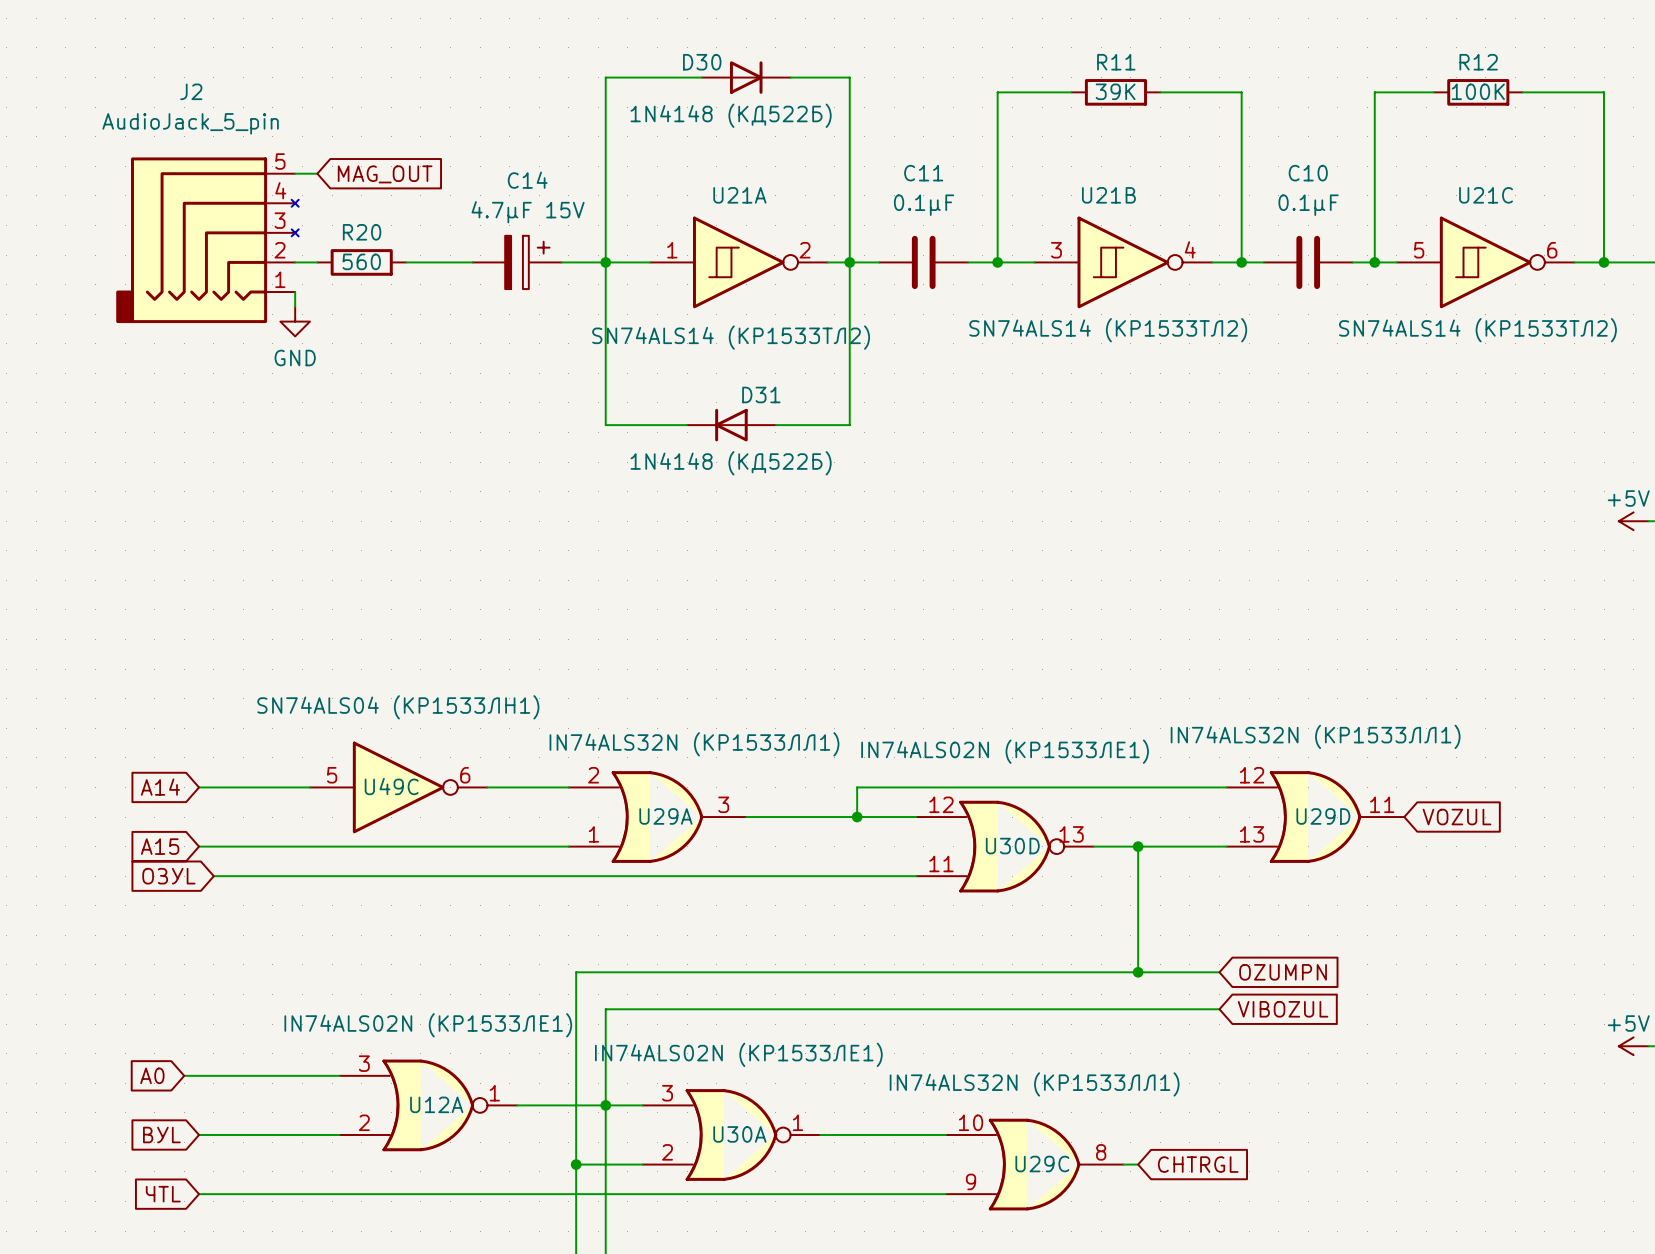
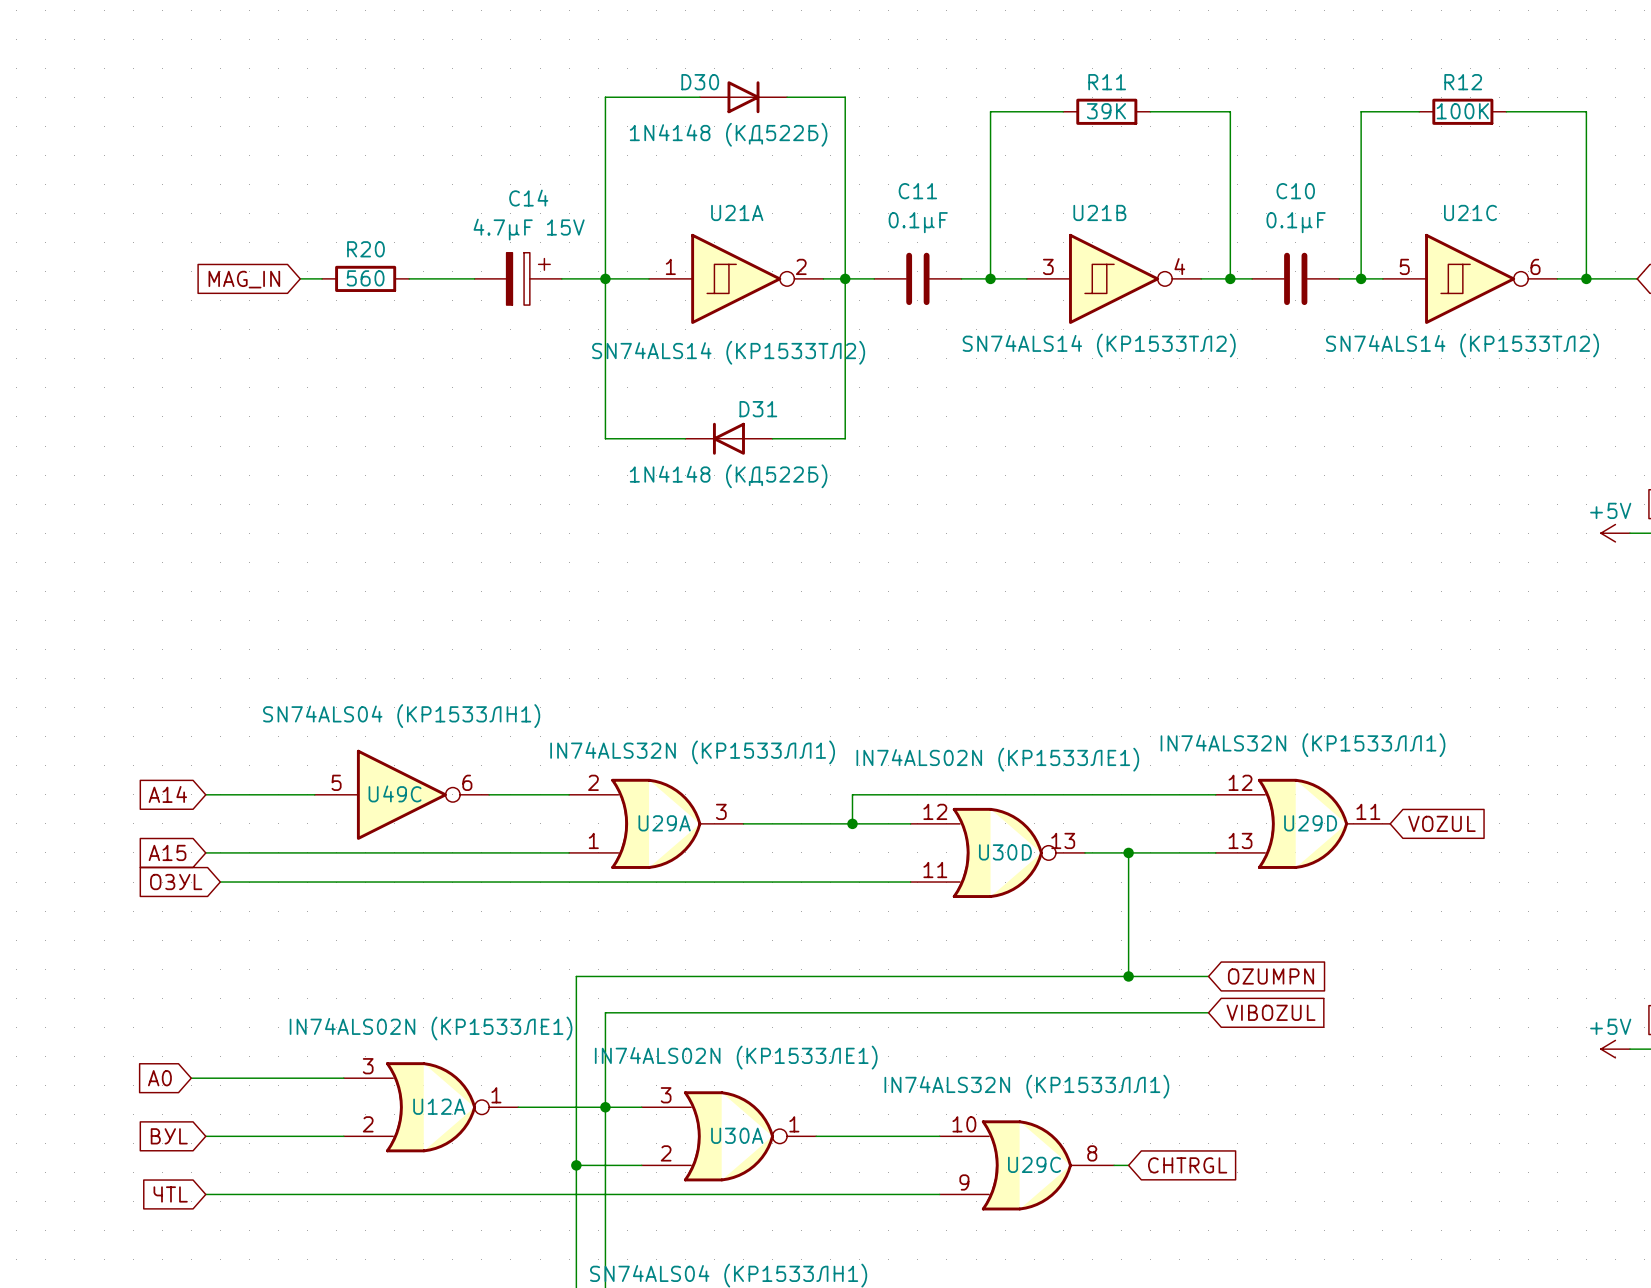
wire: (295, 173) (317, 173) -> none
global label: MAG_OUT (385, 174) -> none
J2: AudioJack_5_pin (207, 240) -> none
global label: none -> MAG_IN (244, 279)
wire: (295, 292) (295, 306) -> none
power symbol: GND (295, 321) -> none

